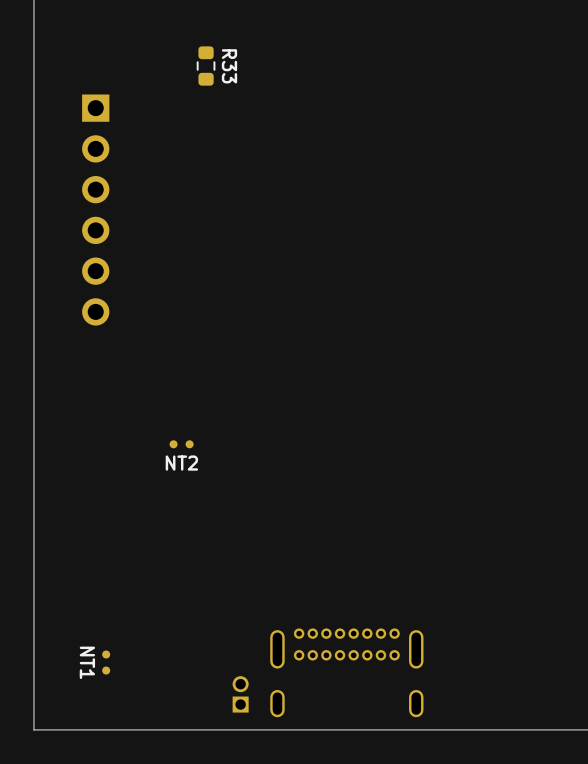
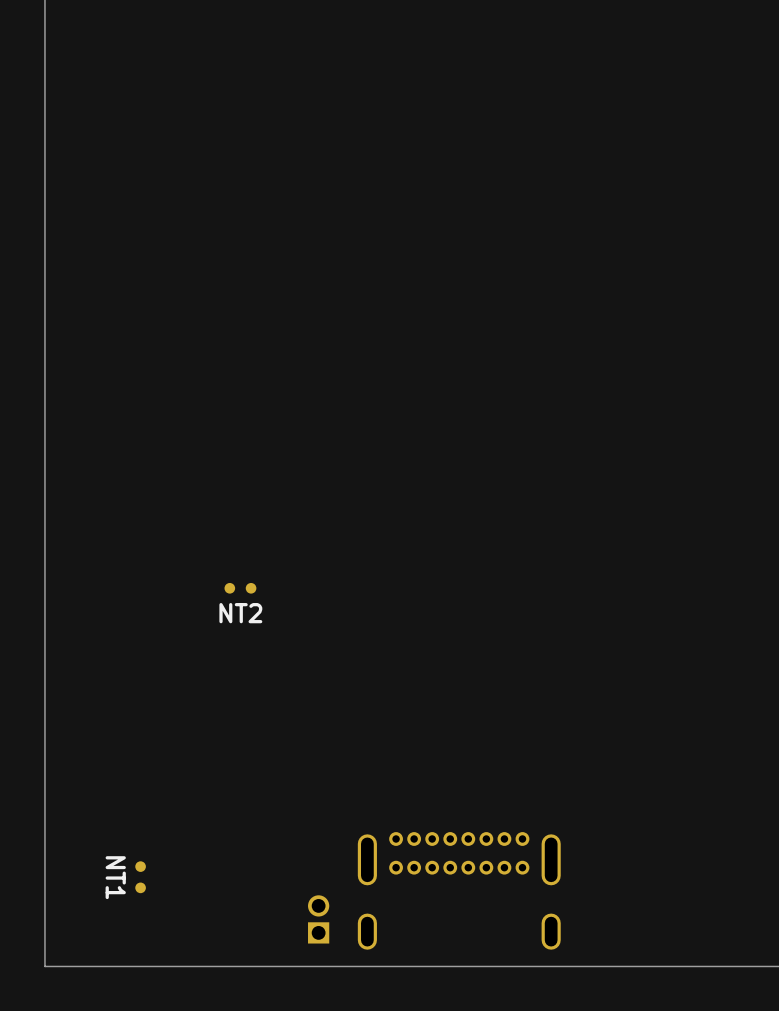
R33: (206, 66) -> none
part: (95, 210) -> none

